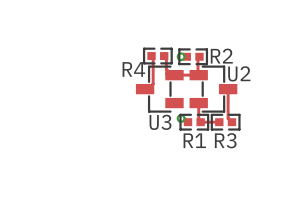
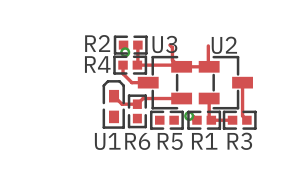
track: none -> (137, 45) (137, 65) (172, 65)
track: (151, 56) (153, 57) (153, 83) (148, 89) (142, 89) -> (123, 65) (123, 73) (131, 82) (145, 82)
R4 position: (157, 56) -> (130, 65)
via position: (181, 56) -> (125, 52)
R2 position: (193, 56) -> (130, 45)
R2 name position: R2 (221, 56) -> R2 (97, 43)
R4 name position: R4 (133, 69) -> R4 (97, 64)
U2 name position: U2 (239, 73) -> U2 (224, 45)
track: none -> (114, 96) (122, 104) (137, 104) (143, 98) (179, 98)
U1: none -> (113, 104)
R6: none -> (137, 111)
U3 name position: U3 (160, 122) -> U3 (164, 44)
R5: none -> (166, 120)

